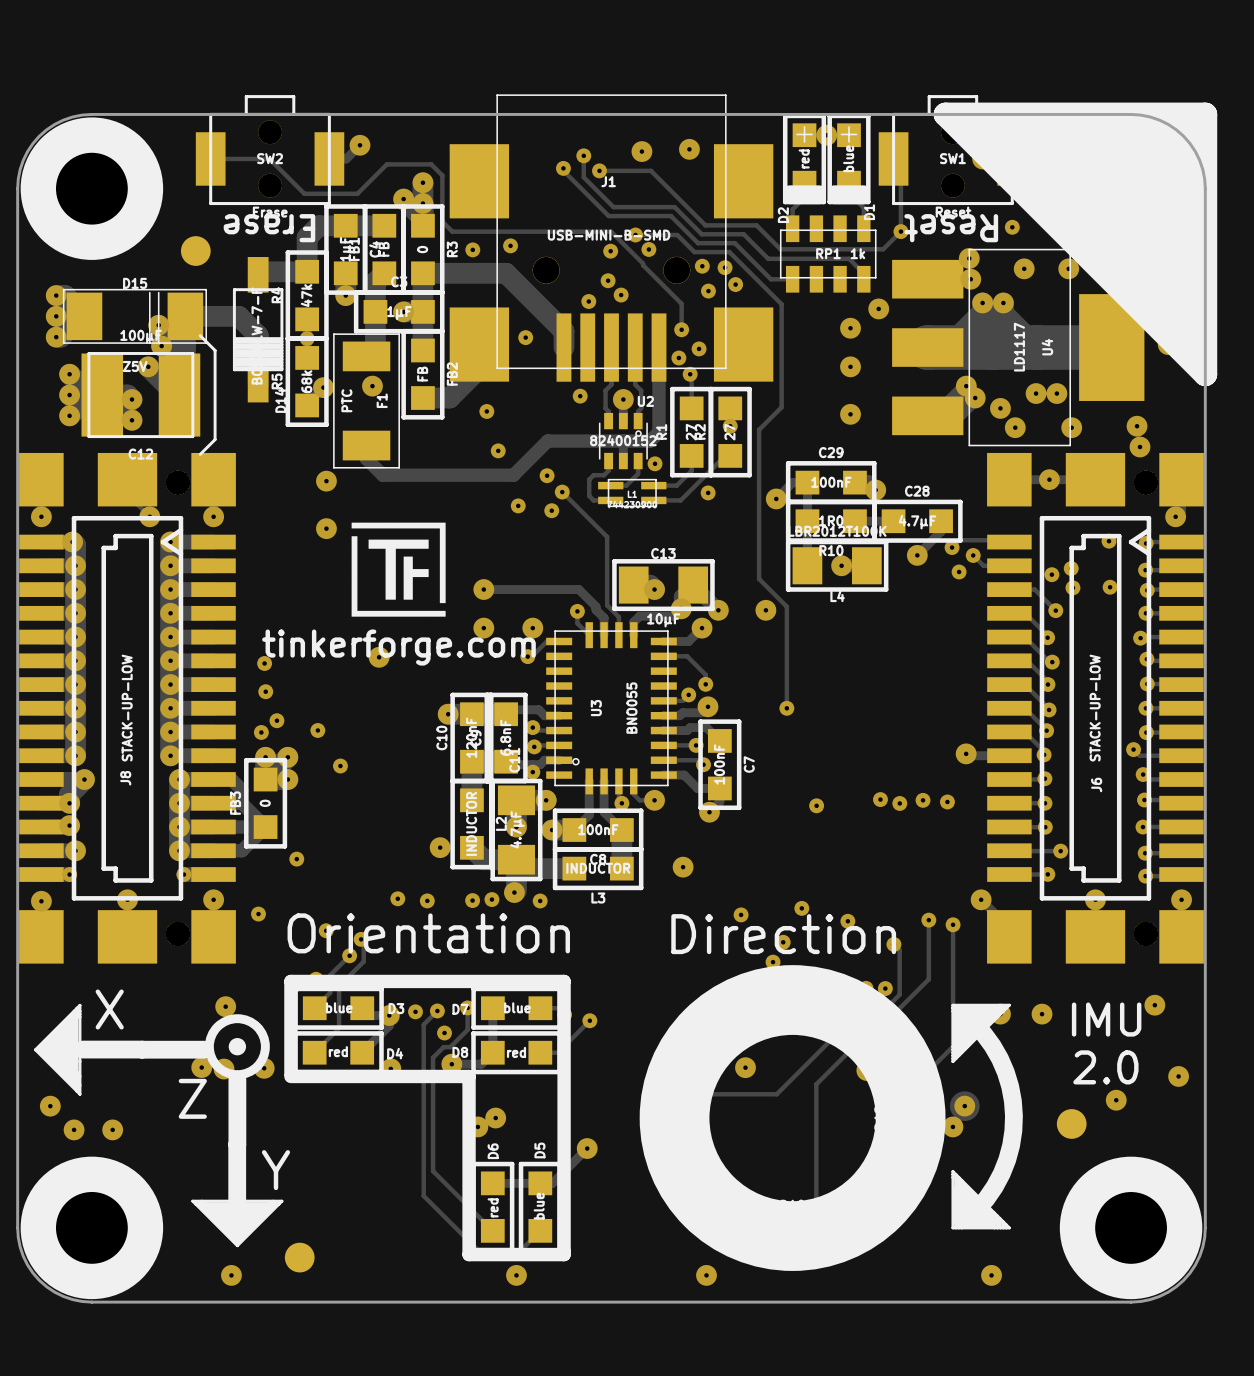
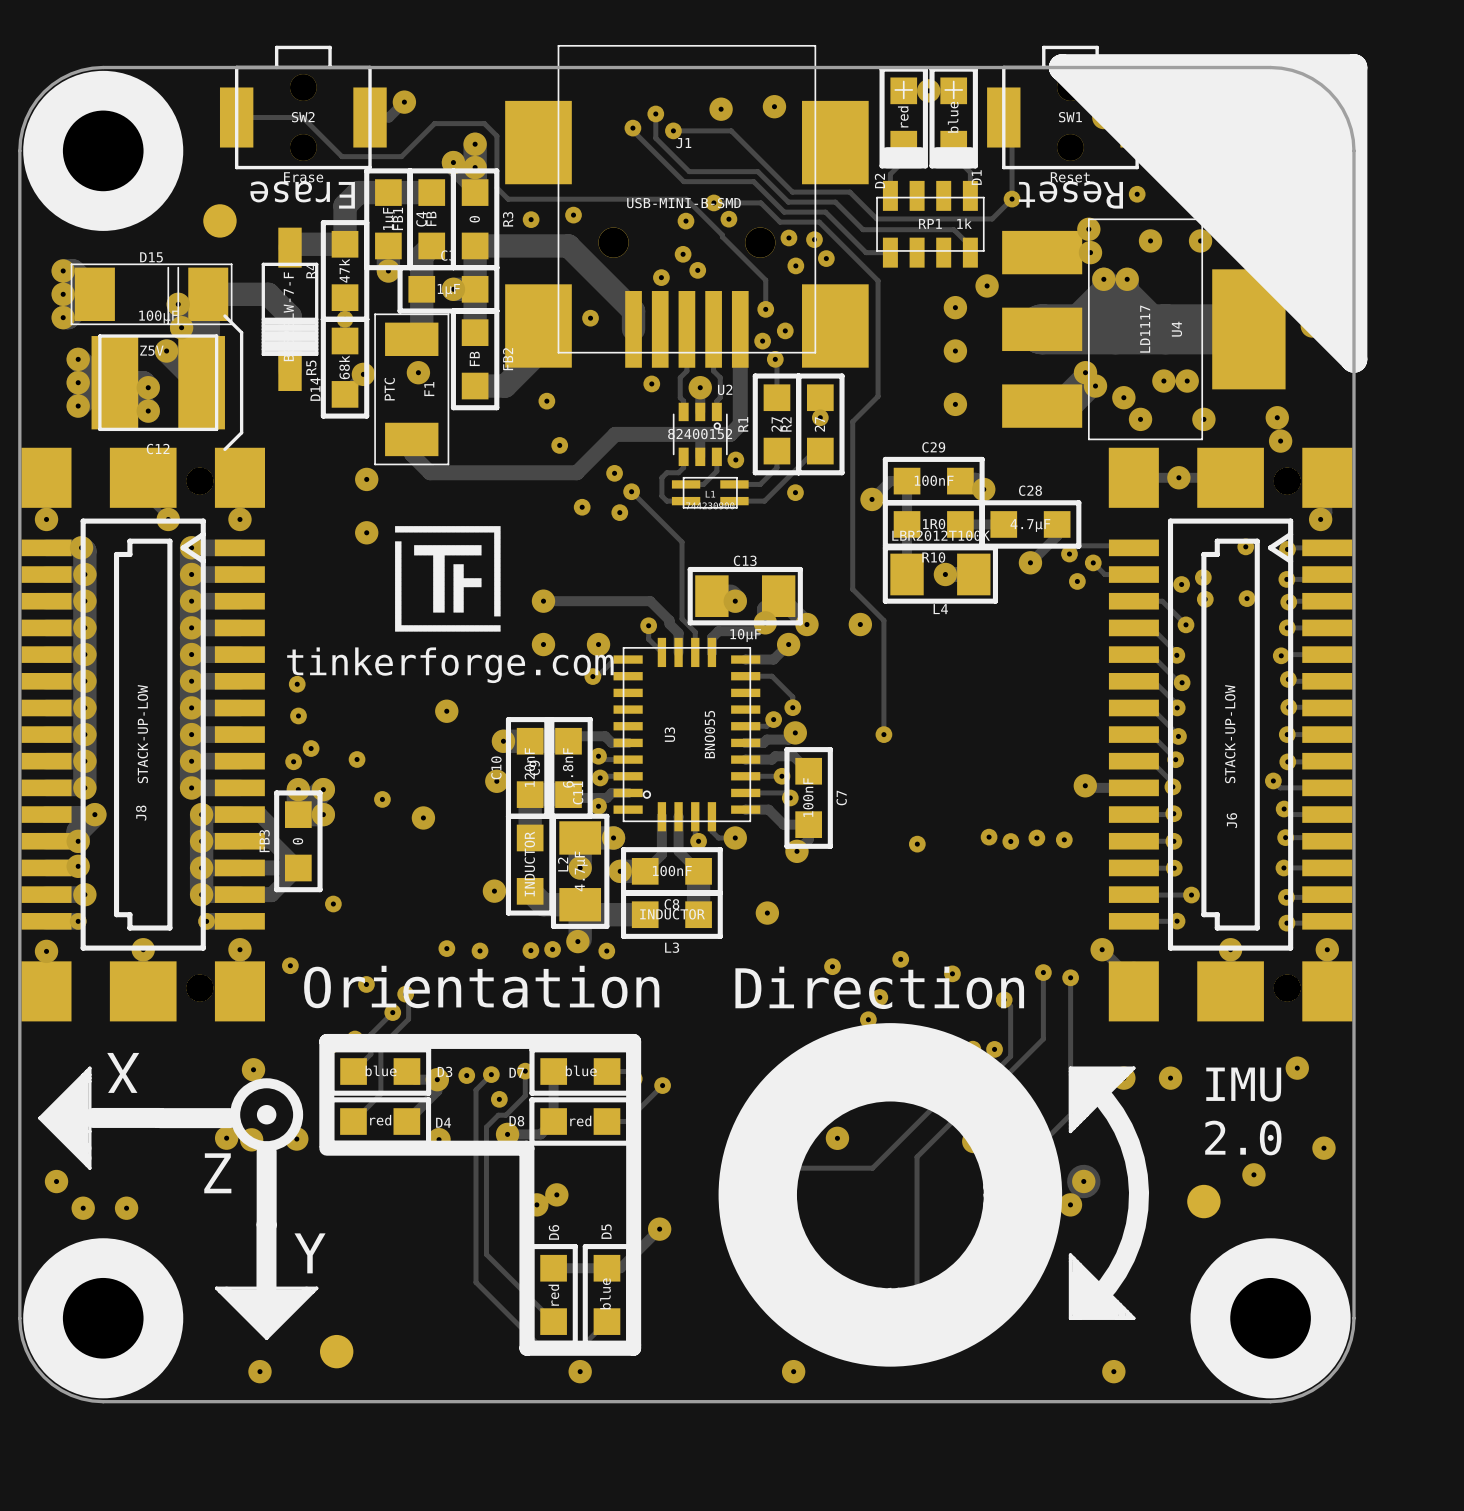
via position: (379, 657) -> (446, 711)
via: none -> (496, 781)
via: none -> (423, 817)

